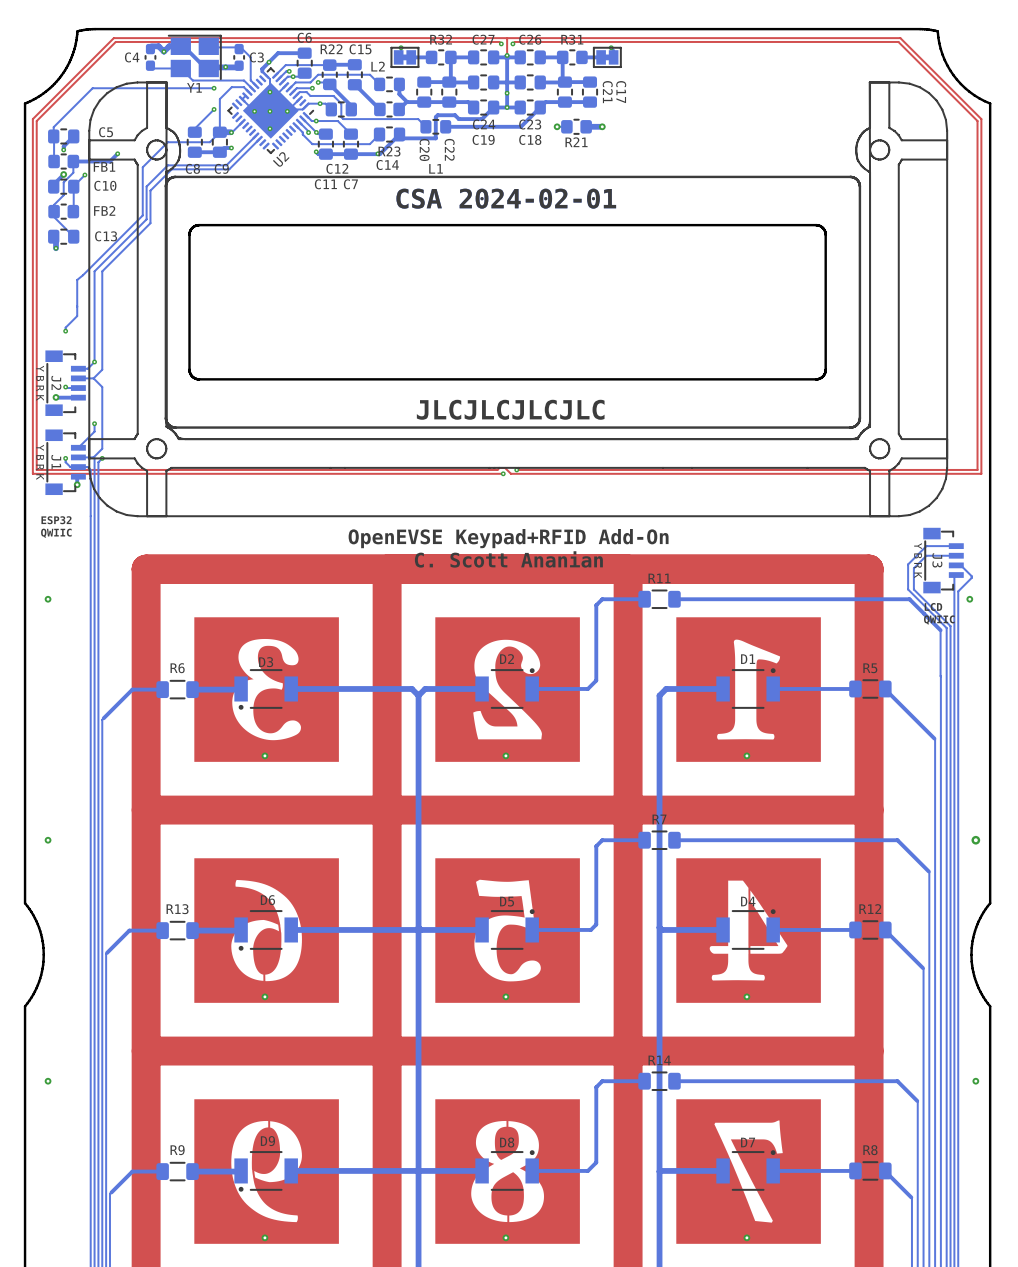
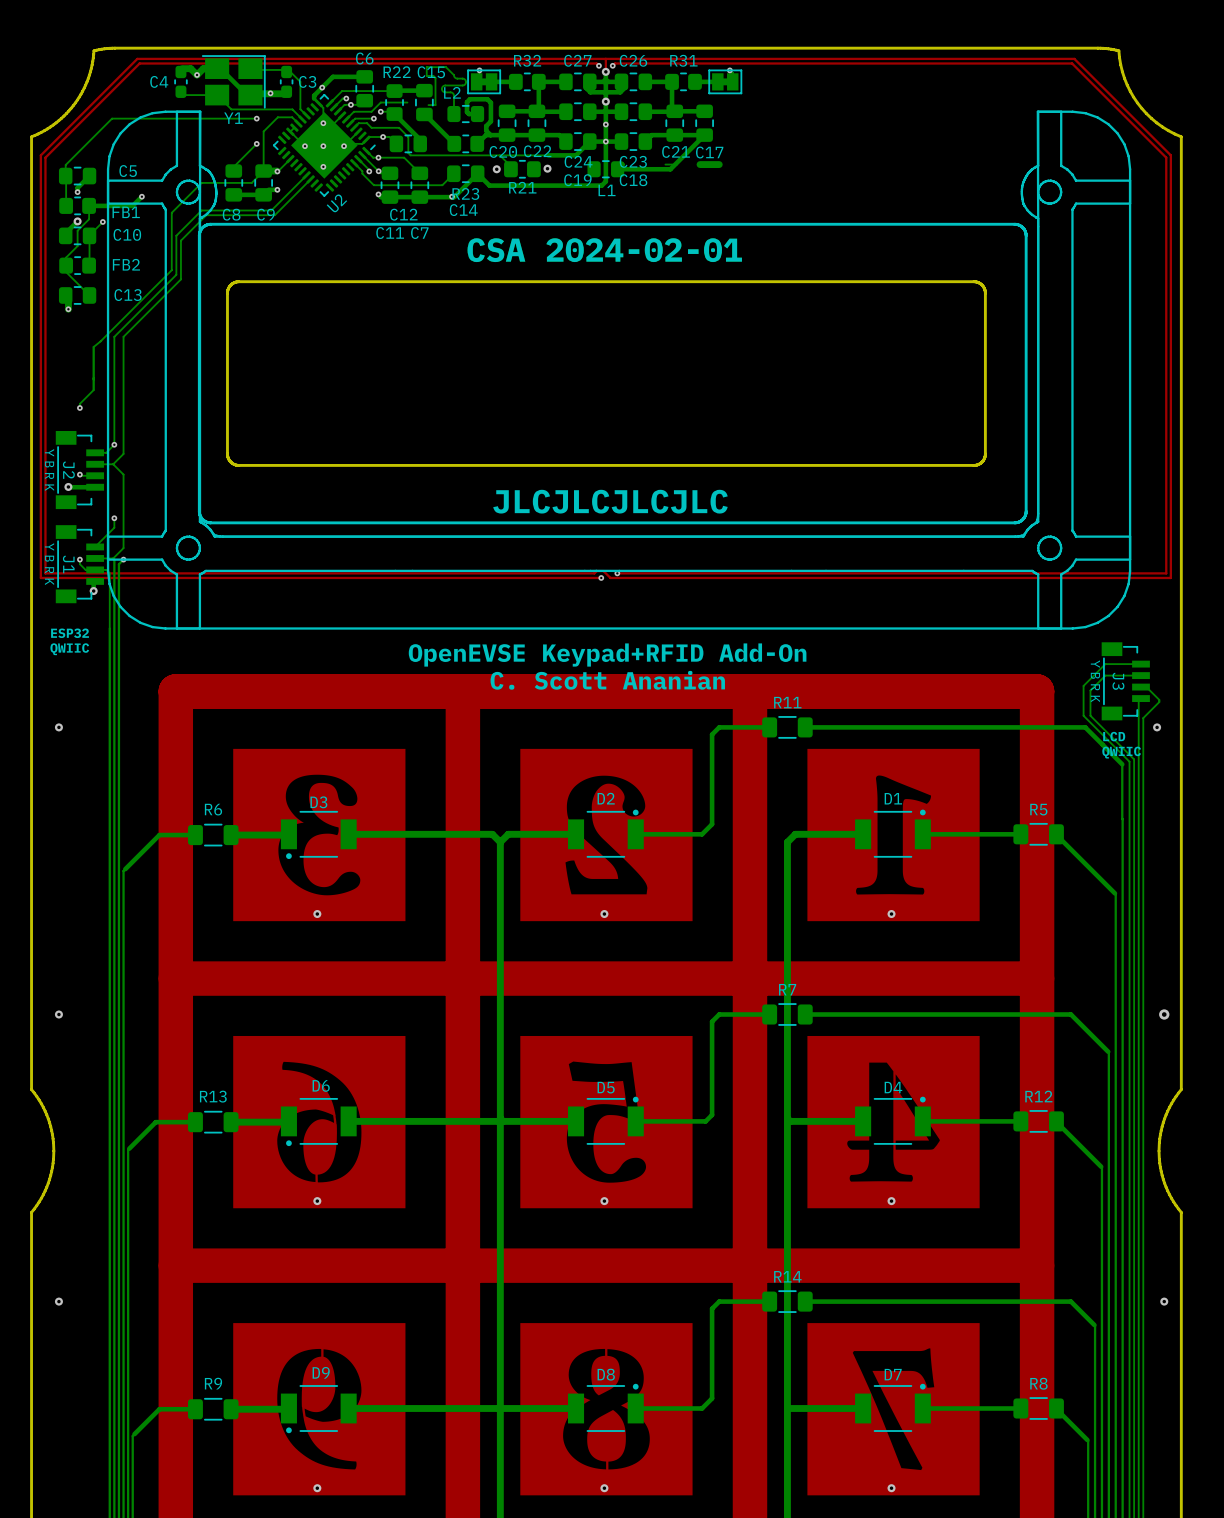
top track: (507, 48) (507, 55) -> none
via: none -> (605, 71)
via: (507, 55) -> none
bottom track: none -> (586, 81) (586, 88) (590, 92) (620, 92) (624, 87) (624, 81)
via: none -> (605, 101)
bottom track: (340, 74) (370, 74) (379, 84) -> (428, 105) (435, 105) (435, 78) (433, 75) (426, 75) (426, 67) (446, 67) (455, 77) (463, 78) (466, 81) (463, 85) (444, 85) (442, 87) (443, 91) (453, 94) (453, 114)
bottom track: (399, 84) (399, 94) (407, 102) -> (477, 114) (468, 114) (467, 112) (467, 102) (469, 99) (487, 99) (490, 102) (490, 121) (486, 126) (486, 130) (490, 135)
C21 name rotation: 0° (607, 92) -> 90° counterclockwise (676, 151)
C21 name position: C21 (607, 92) -> C21 (676, 151)
C17 name rotation: 0° (621, 92) -> 90° counterclockwise (709, 152)
C17 name position: C17 (621, 92) -> C17 (709, 152)
bottom track: none -> (605, 141) (605, 181) (601, 185) (489, 185) (482, 178)
bottom track: (540, 107) (520, 126) -> (704, 135) (670, 169) (617, 169) (622, 164)
bottom track: (458, 119) (455, 115) (437, 115) (435, 117) (435, 138) (403, 138) -> (548, 155) (499, 155)
L1 position: (435, 126) -> (605, 169)
bottom track: (520, 126) (445, 126) -> none
via: (557, 126) -> none
R21 position: (576, 126) -> (522, 169)
via: (602, 126) -> none
via: none -> (496, 169)
via: none -> (547, 168)
C20 name rotation: 0° (424, 149) -> 90° counterclockwise (503, 151)
C22 name rotation: 0° (449, 149) -> 90° counterclockwise (537, 151)
L1 name position: L1 (436, 168) -> L1 (607, 190)

